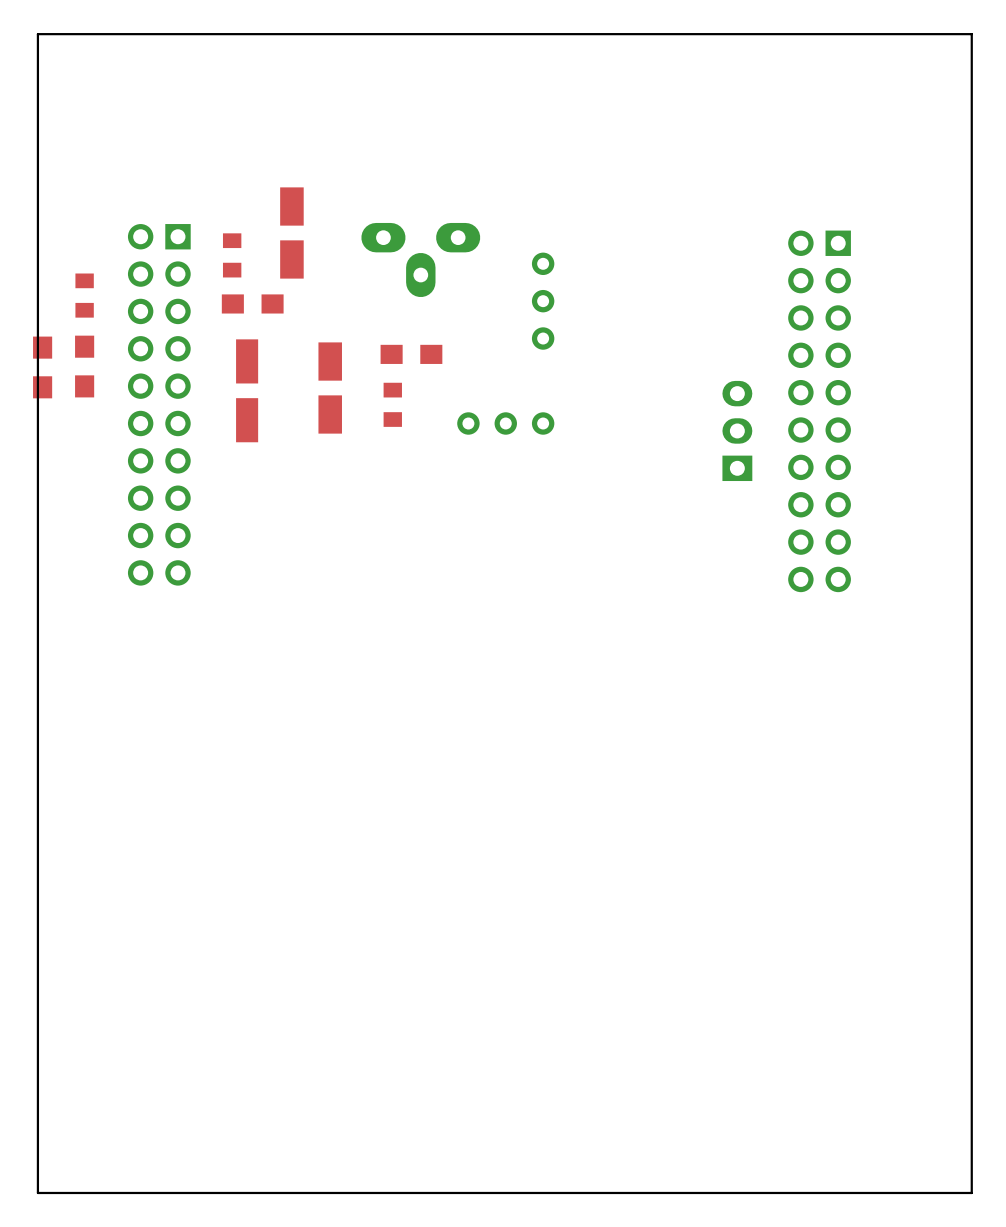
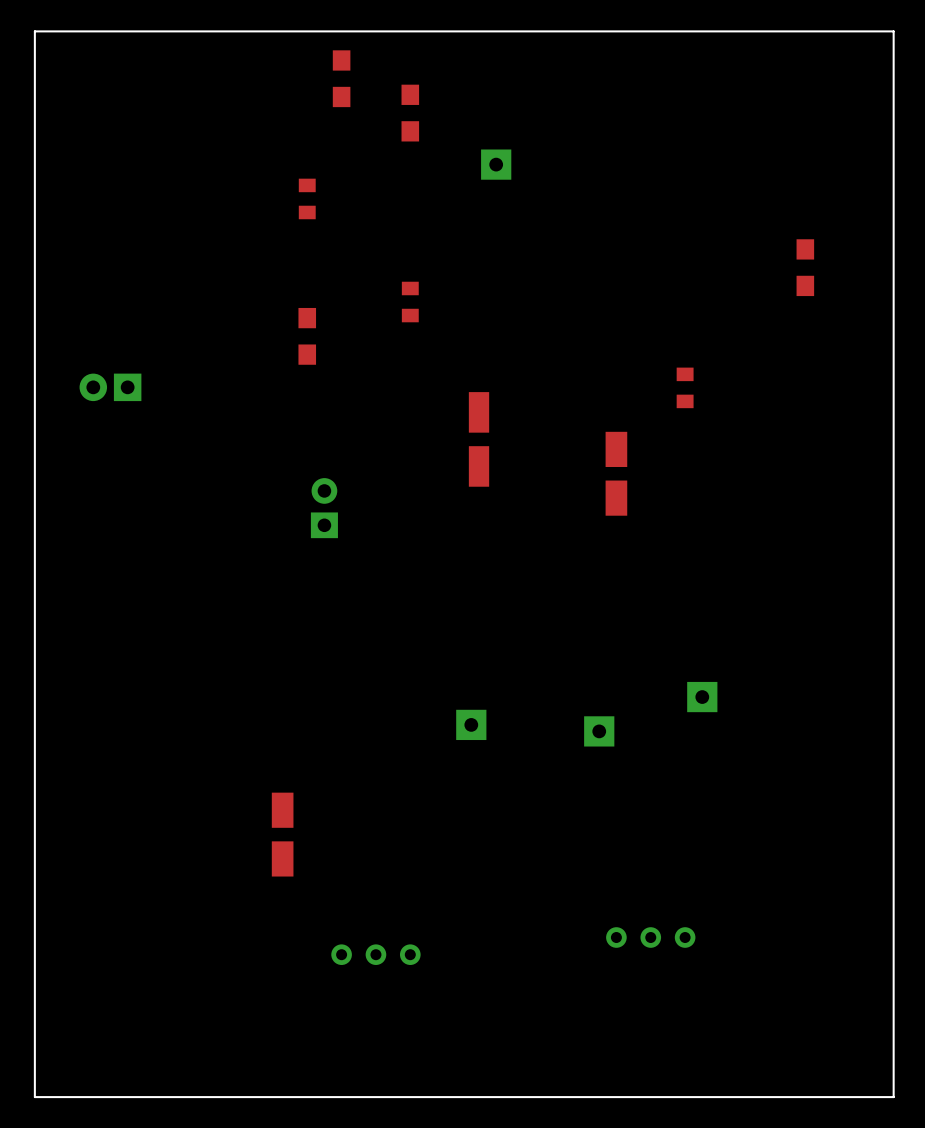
part: none -> (341, 78)
part: none -> (410, 113)
part: none -> (496, 164)
part: none -> (307, 198)
part: (291, 232) -> none
part: (232, 255) -> none
part: (420, 260) -> none
part: none -> (805, 267)
part: (84, 295) -> none
part: (543, 301) -> none
part: (252, 303) -> none
part: (411, 354) -> none
part: none -> (307, 336)
part: (84, 366) -> none
part: (42, 367) -> none
part footprint: [722, 380, 753, 482] -> [676, 367, 694, 409]
part: (330, 388) -> none
part position: (247, 390) -> (479, 439)
part: (159, 404) -> none
part position: (392, 404) -> (410, 302)
part: (819, 411) -> none
part: none -> (110, 387)
part: (505, 423) -> none
part: none -> (616, 473)
part: none -> (324, 508)
part: none -> (702, 697)
part: none -> (471, 724)
part: none -> (599, 731)
part: none -> (282, 834)
part: none -> (650, 937)
part: none -> (375, 954)

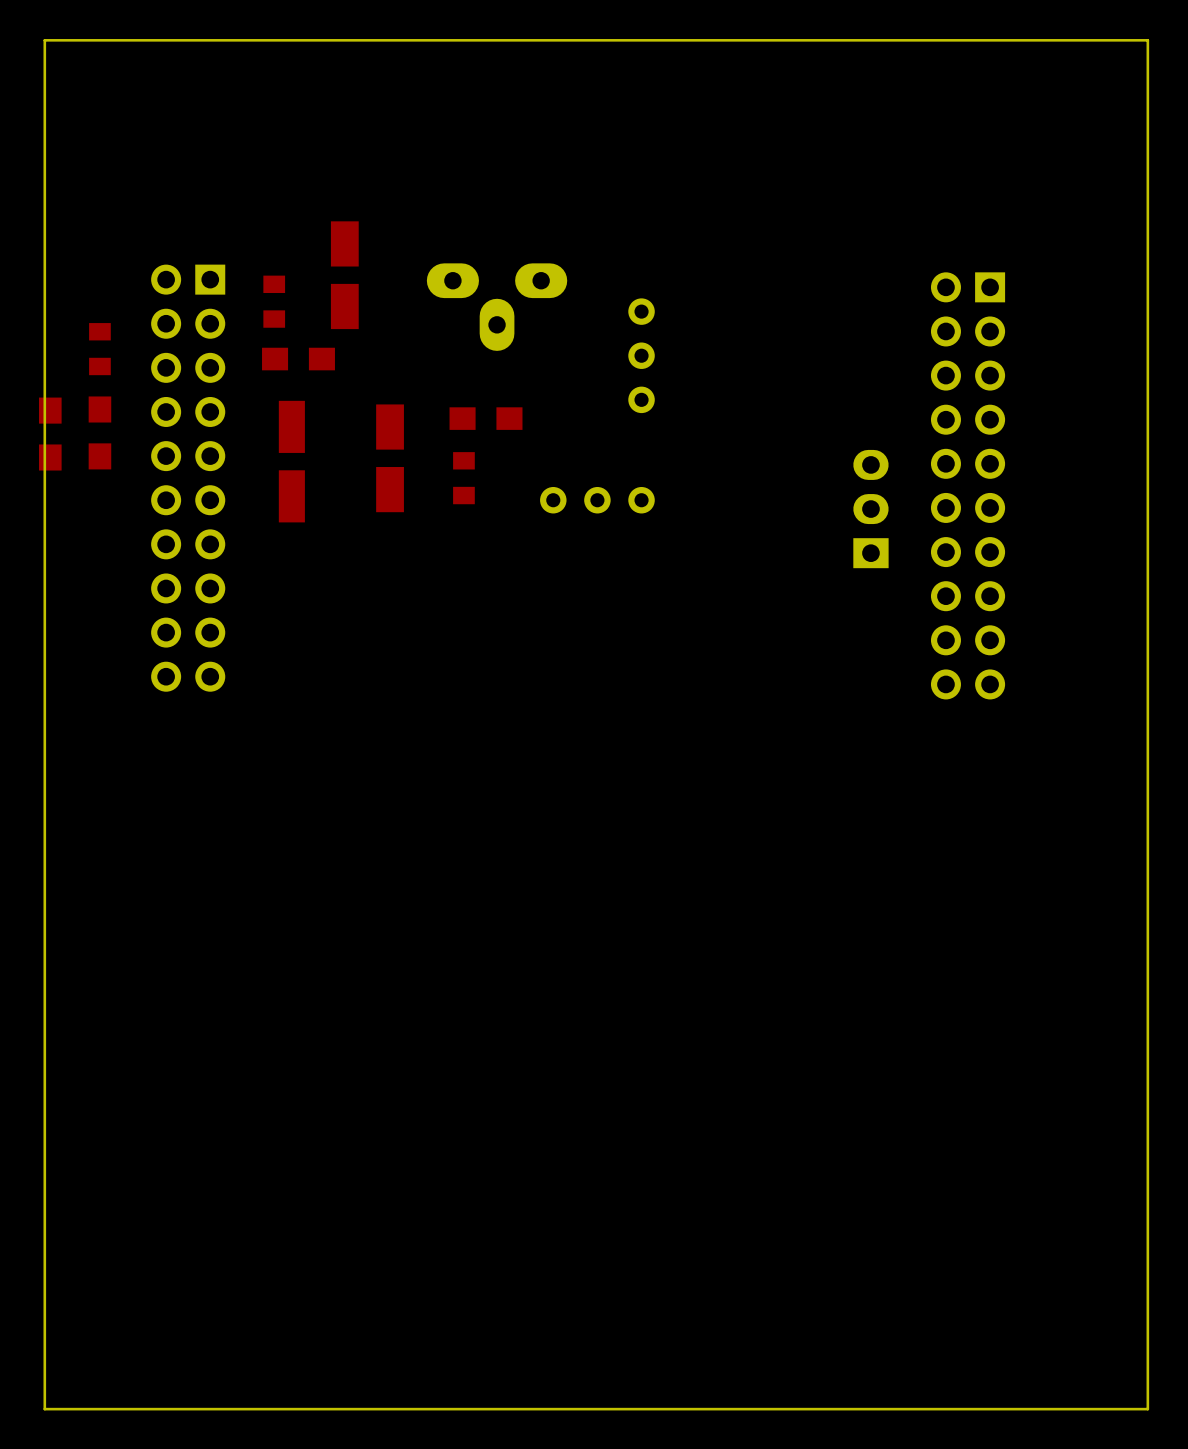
part: (341, 78) -> none
part: (410, 113) -> none
part: (496, 164) -> none
part: (307, 198) -> none
part: none -> (344, 275)
part: none -> (274, 301)
part: none -> (497, 307)
part: (805, 267) -> none
part: none -> (99, 349)
part: none -> (641, 355)
part: none -> (298, 359)
part position: (410, 302) -> (463, 478)
part: none -> (486, 418)
part: (307, 336) -> none
part: none -> (50, 434)
part: none -> (99, 432)
part: none -> (390, 458)
part footprint: [676, 367, 694, 409] -> [853, 449, 889, 569]
part: none -> (188, 478)
part: none -> (968, 485)
part: (110, 387) -> none
part: none -> (597, 500)
part position: (479, 439) -> (291, 461)
part: (616, 473) -> none
part: (324, 508) -> none
part: (702, 697) -> none
part: (471, 724) -> none
part: (599, 731) -> none
part: (282, 834) -> none
part: (650, 937) -> none
part: (375, 954) -> none

